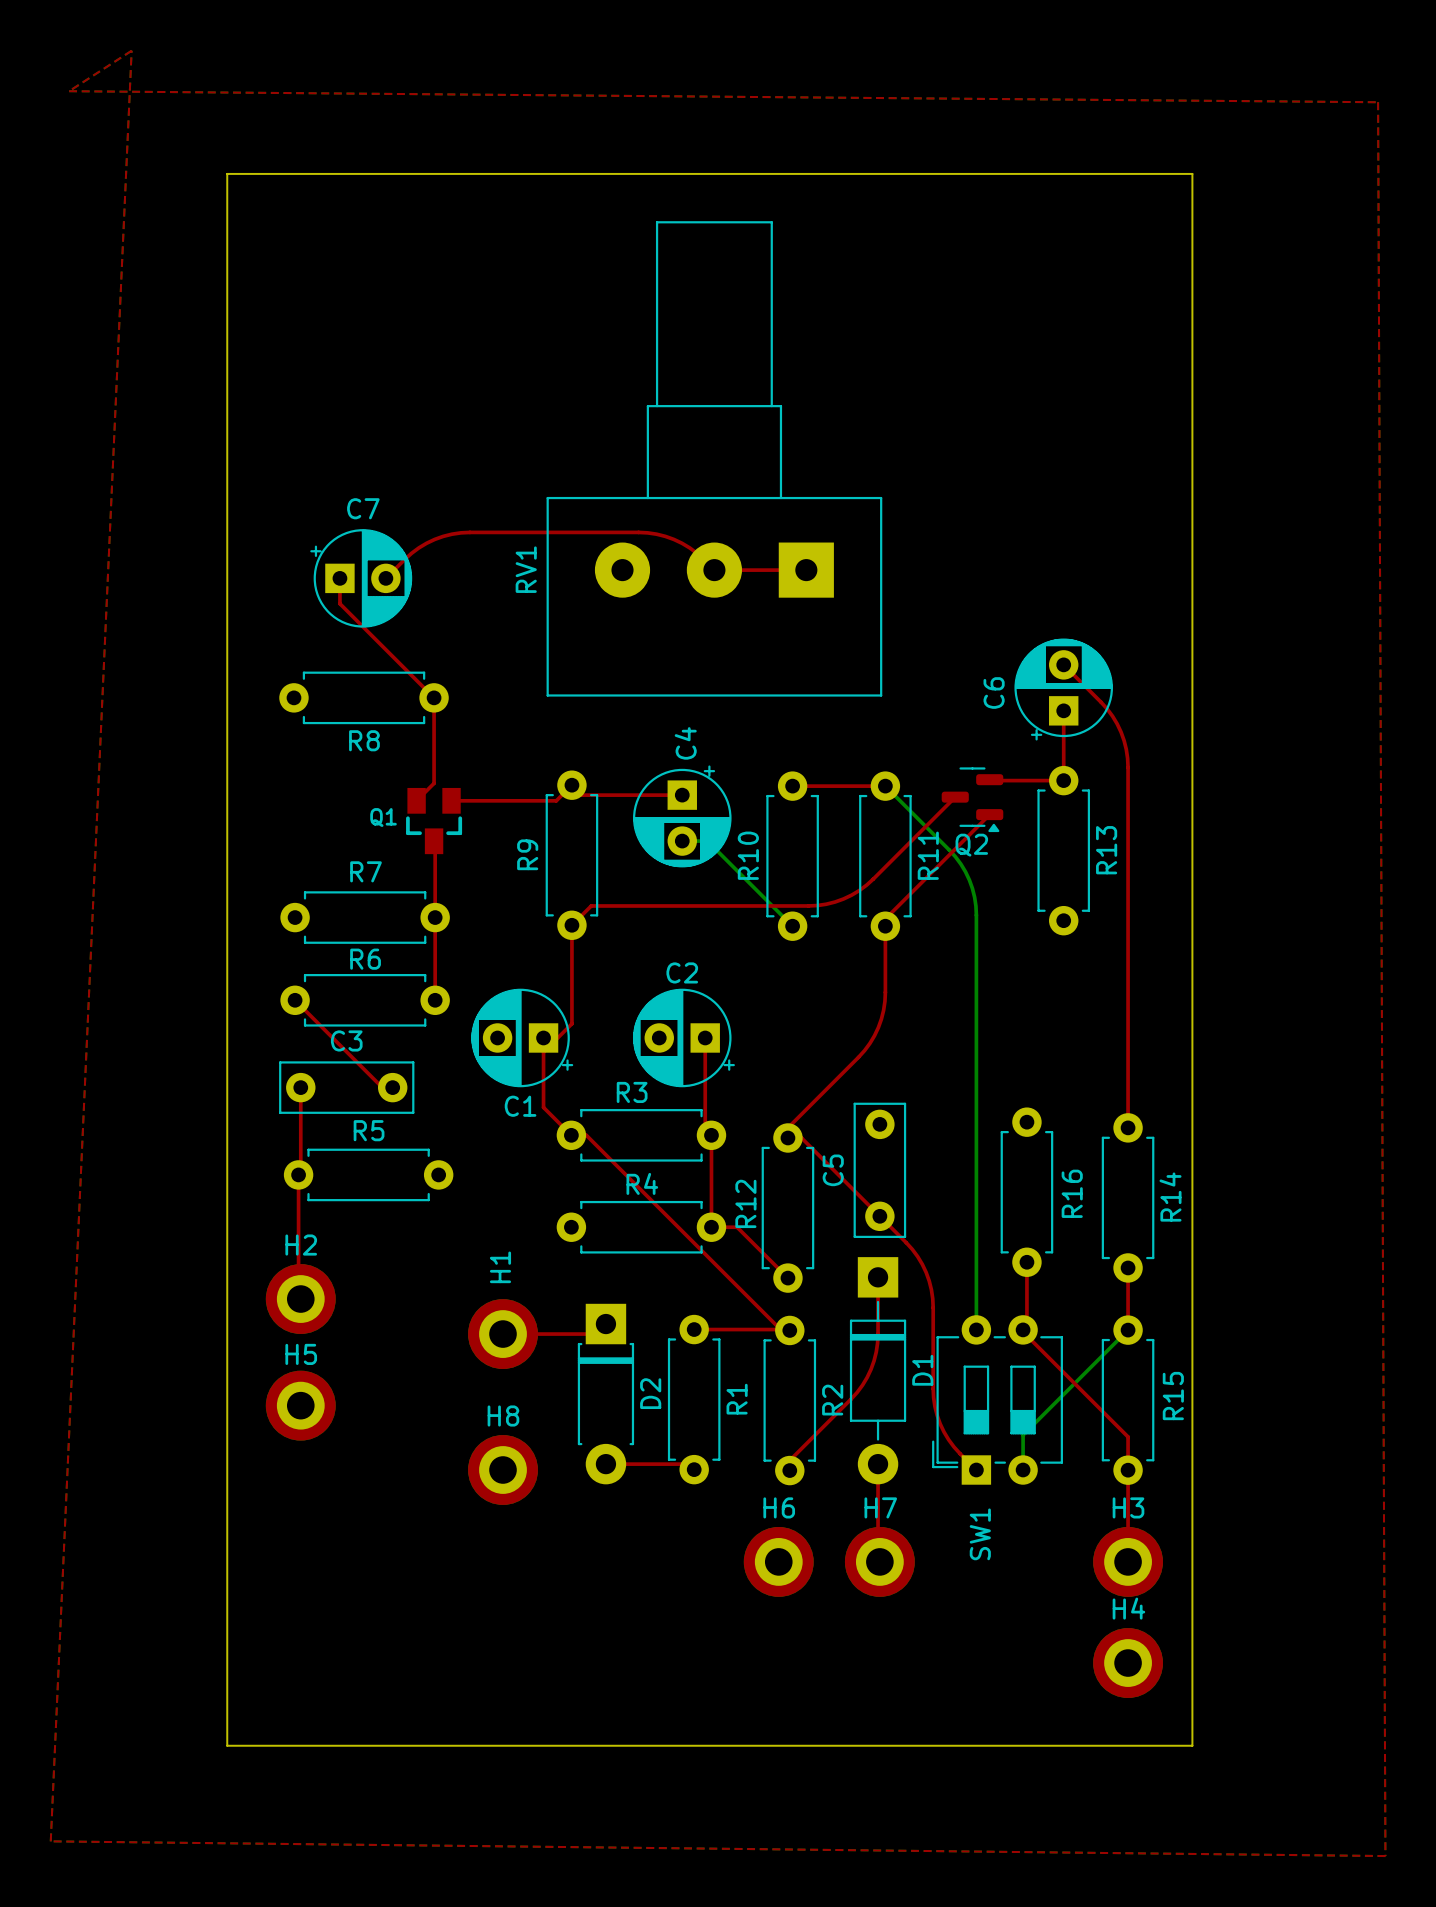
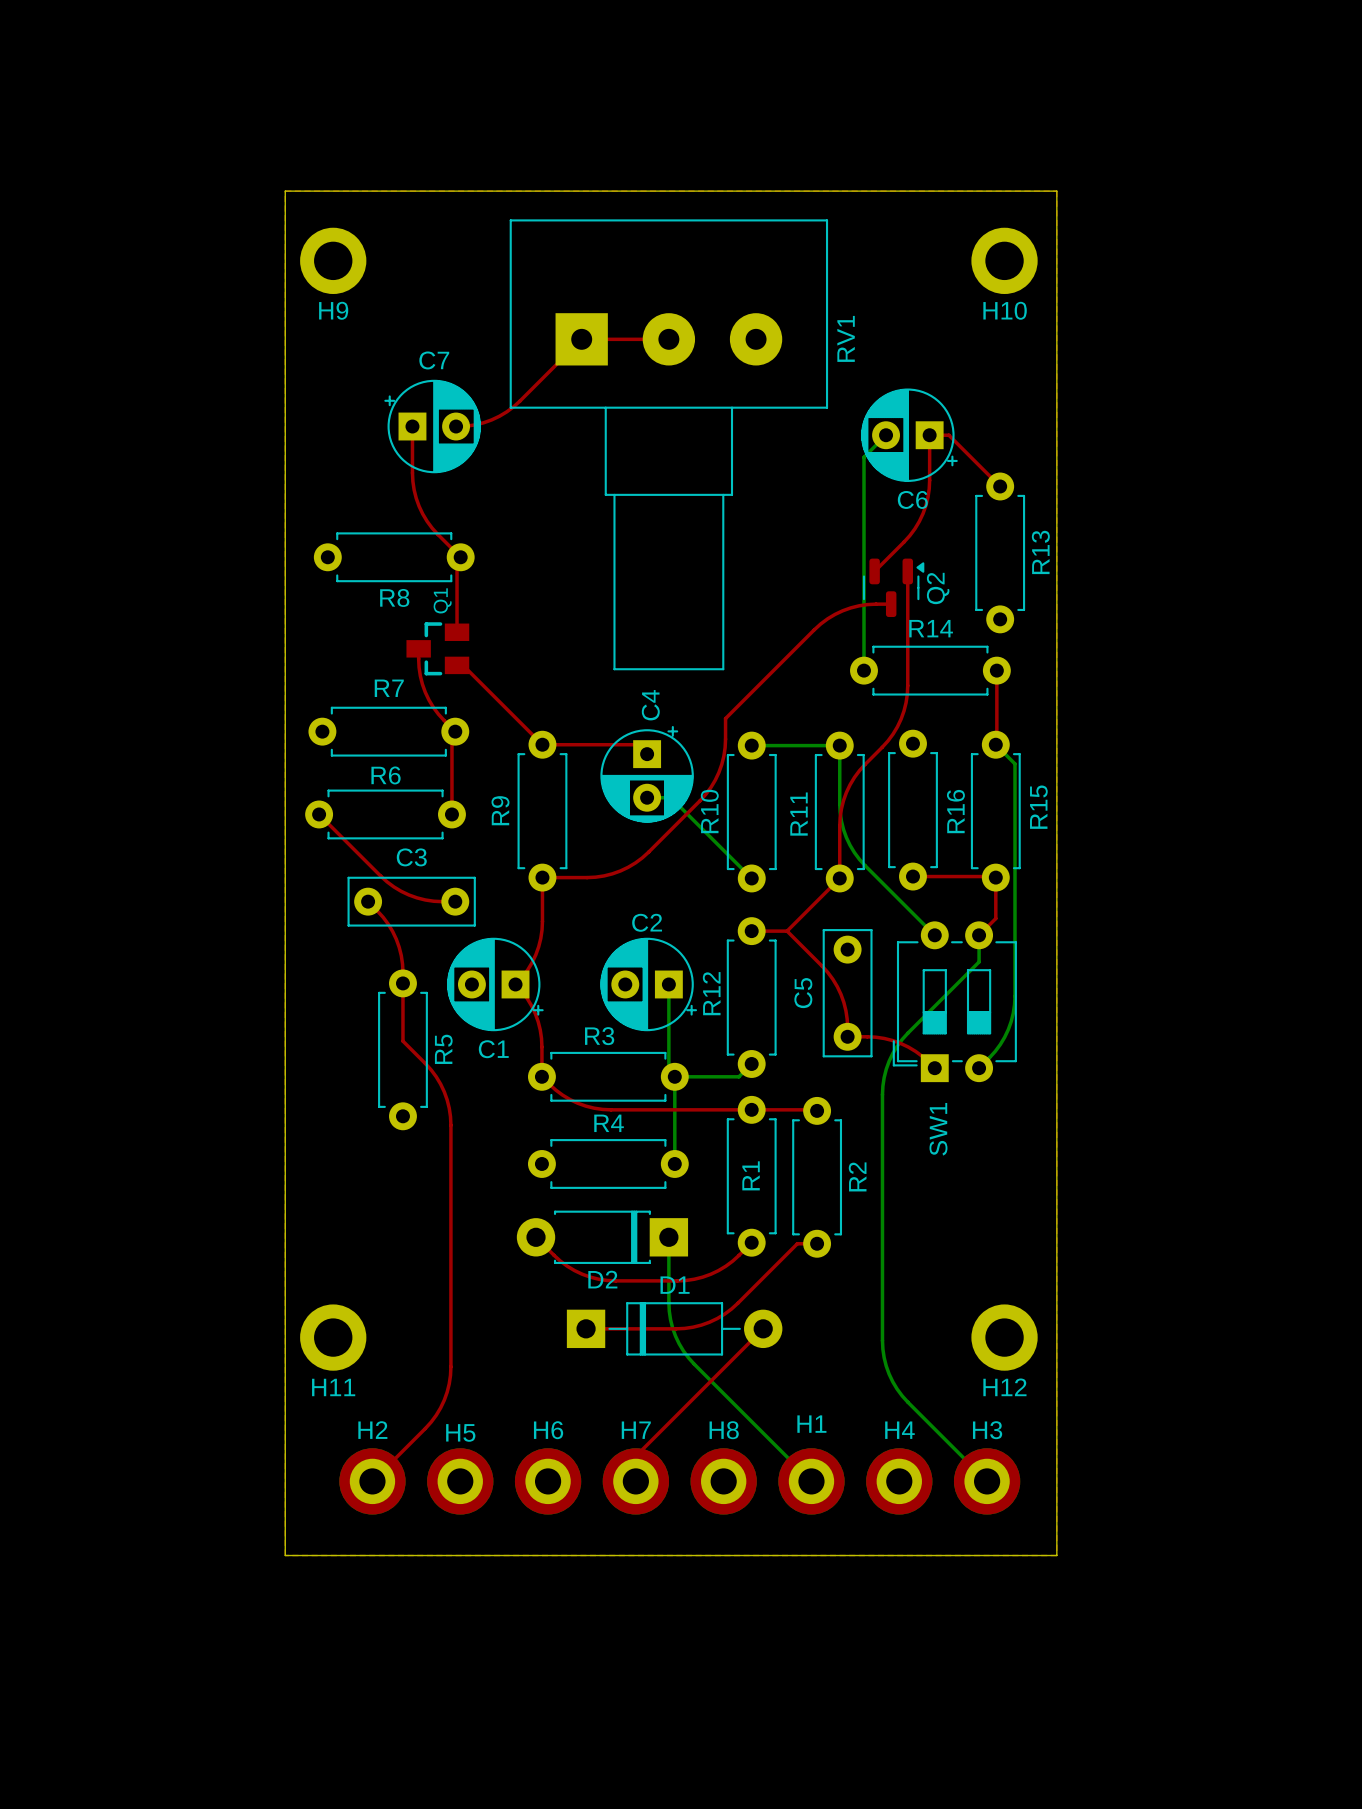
top zone outline: (131, 50) (50, 1841) (1385, 1856) (1378, 102) (69, 91) (131, 50) -> none
board edge: (227, 173) (1192, 173) (1192, 1745) (227, 1745) (227, 173) -> (285, 191) (285, 1555) (1056, 1555) (1056, 191) (285, 191)
H9: none -> (333, 260)
H10: none -> (1004, 260)
top track: none -> (668, 339) (581, 339) (506, 411) (483, 422) (456, 426)
top track: none -> (412, 426) (412, 481) (419, 506) (432, 528) (460, 557) (457, 560) (457, 632)
RV1 rotation: 0° (714, 458) -> 180° (668, 444)
bottom track: none -> (886, 435) (863, 457) (863, 670)
top track: none -> (1000, 486) (948, 435) (929, 435) (929, 488) (923, 513) (909, 535) (874, 571)
top track: (806, 570) (714, 570) (696, 553) (681, 543) (665, 536) (647, 532) (469, 532) (443, 536) (426, 543) (411, 553) (385, 578) -> none
top track: (339, 578) (339, 603) (434, 697) (434, 783) (416, 800) -> none
C7 position: (361, 578) -> (432, 426)
top track: (1063, 664) (1112, 716) (1124, 740) (1127, 758) (1128, 1127) -> none
top track: none -> (418, 648) (420, 675) (425, 692) (438, 714) (455, 731) (451, 734) (451, 814)
C6 rotation: 0° (1063, 689) -> 90° counterclockwise (909, 435)
C6 position: (1063, 689) -> (909, 435)
R8 position: (364, 697) -> (394, 557)
top track: none -> (996, 670) (995, 744)
top track: (1063, 710) (1063, 780) (989, 779) -> none
bottom track: none -> (995, 744) (1014, 763) (1014, 1004) (1011, 1021) (1004, 1037) (995, 1051) (979, 1068)
top track: (792, 786) (885, 786) -> none
bottom track: none -> (751, 745) (839, 745) (840, 812) (843, 829) (850, 845) (865, 865) (934, 935)
bottom track: (885, 786) (955, 856) (965, 871) (974, 897) (976, 915) (976, 1329) -> none
top track: (682, 795) (581, 795) (571, 785) (556, 800) (451, 800) -> (647, 754) (637, 744) (542, 744) (463, 665) (457, 665)
top track: (955, 797) (866, 885) (851, 895) (835, 902) (808, 905) (591, 905) (571, 925) -> (891, 604) (859, 605) (842, 610) (827, 618) (725, 718) (723, 756) (715, 780) (700, 800) (642, 857) (620, 870) (604, 875) (542, 877)
Q2 rotation: 0° (972, 799) -> 90° counterclockwise (893, 587)
Q2 position: (972, 799) -> (893, 587)
top track: (989, 814) (885, 918) -> (907, 571) (906, 702) (901, 719) (893, 734) (859, 770) (846, 792) (840, 817) (839, 871)
Q1 rotation: 0° (434, 821) -> 90° clockwise (437, 648)
Q1 position: (434, 821) -> (437, 648)
top track: (434, 841) (435, 1000) -> none
R13 position: (1063, 850) -> (1000, 552)
R11 name position: R11 (928, 855) -> R11 (799, 814)
top track: none -> (319, 814) (393, 886) (409, 895) (425, 899) (455, 901)
R7 position: (365, 917) -> (388, 731)
top track: none -> (912, 876) (994, 876) (995, 918) (979, 935)
top track: (885, 926) (884, 1001) (881, 1019) (874, 1035) (858, 1057) (778, 1137) -> (839, 878) (787, 931)
top track: none -> (368, 901) (388, 924) (396, 939) (401, 955) (402, 1041) (431, 1069) (440, 1084) (447, 1099) (450, 1125) (450, 1366) (449, 1383) (444, 1400) (431, 1422) (372, 1481)
top track: (571, 971) (571, 1023) (543, 1052) -> (542, 921) (540, 938) (535, 954) (527, 969) (515, 984) (527, 998) (538, 1021) (541, 1038) (541, 1076) (562, 1095) (577, 1103) (602, 1109) (817, 1110)
top track: none -> (751, 931) (787, 931)
top track: none -> (787, 931) (827, 972) (837, 986) (845, 1010) (847, 1036) (875, 1037) (900, 1043) (915, 1051) (934, 1068)
bottom track: none -> (979, 935) (979, 961) (902, 1039) (889, 1061) (884, 1077) (882, 1094) (882, 1340) (886, 1365) (892, 1381) (902, 1395) (987, 1481)
top track: (295, 1000) (382, 1087) (392, 1087) -> none
R6 position: (365, 1000) -> (385, 814)
top track: (705, 1037) (705, 1129) (711, 1135) (711, 1227) (737, 1227) (787, 1278) -> none
bottom track: none -> (668, 984) (668, 1070) (674, 1076)
top track: (543, 1039) (543, 1107) (571, 1135) (586, 1135) (780, 1329) (694, 1329) -> none
top track: (300, 1087) (300, 1172) (298, 1174) (298, 1296) (300, 1299) -> none
C3 position: (346, 1087) -> (411, 901)
bottom track: none -> (751, 1063) (738, 1076) (674, 1076)
bottom track: none -> (674, 1076) (674, 1163)
top track: (787, 1137) (801, 1137) (906, 1242) (922, 1264) (929, 1281) (932, 1298) (933, 1388) (937, 1415) (948, 1439) (976, 1470) -> none
C5 position: (879, 1170) -> (847, 993)
R5 rotation: 0° (368, 1174) -> 90° clockwise (402, 1049)
R16 position: (1026, 1192) -> (912, 810)
R14 rotation: 0° (1128, 1197) -> 90° clockwise (930, 670)
R14 position: (1128, 1197) -> (930, 670)
R14 name position: R14 (1170, 1197) -> R14 (931, 628)
R12 position: (787, 1208) -> (751, 997)
top track: (1026, 1262) (1026, 1322) (1023, 1326) (1023, 1331) (1128, 1436) (1128, 1561) -> none
H1 name rotation: 0° (500, 1267) -> 90° clockwise (811, 1424)
top track: (1128, 1267) (1128, 1330) -> none
top track: (878, 1277) (877, 1343) (874, 1360) (867, 1377) (851, 1399) (780, 1469) -> none
H2 position: (300, 1299) -> (372, 1481)
top track: none -> (536, 1237) (560, 1261) (574, 1270) (598, 1279) (615, 1280) (677, 1280) (702, 1277) (725, 1266) (751, 1242)
bottom track: none -> (668, 1237) (669, 1311) (672, 1328) (679, 1343) (694, 1364) (811, 1481)
top track: none -> (817, 1243) (797, 1243) (731, 1309) (709, 1322) (684, 1328) (586, 1328)
top track: (605, 1324) (595, 1334) (504, 1334) -> none
bottom track: (1128, 1330) (1023, 1435) (1023, 1470) -> none
H1 position: (503, 1334) -> (811, 1481)
D1 rotation: 0° (878, 1370) -> 90° counterclockwise (674, 1328)
D1 position: (878, 1370) -> (674, 1328)
D2 rotation: 0° (605, 1394) -> 90° clockwise (602, 1237)
R1 position: (694, 1399) -> (751, 1176)
R1 name position: R1 (737, 1399) -> R1 (751, 1175)
SW1 position: (997, 1399) -> (954, 1001)
R2 position: (789, 1400) -> (817, 1177)
R15 position: (1128, 1400) -> (995, 811)
top track: none -> (763, 1328) (635, 1456) (635, 1481)
H5 position: (300, 1405) -> (460, 1481)
H11: none -> (333, 1337)
H12: none -> (1004, 1337)
top track: (605, 1464) (688, 1464) (694, 1469) -> none
top track: (878, 1464) (878, 1541) -> none
H8 position: (503, 1470) -> (723, 1481)
H6 position: (778, 1561) -> (548, 1481)
H7 position: (879, 1561) -> (635, 1481)
H3 position: (1128, 1561) -> (987, 1481)
H4 position: (1128, 1663) -> (899, 1481)

